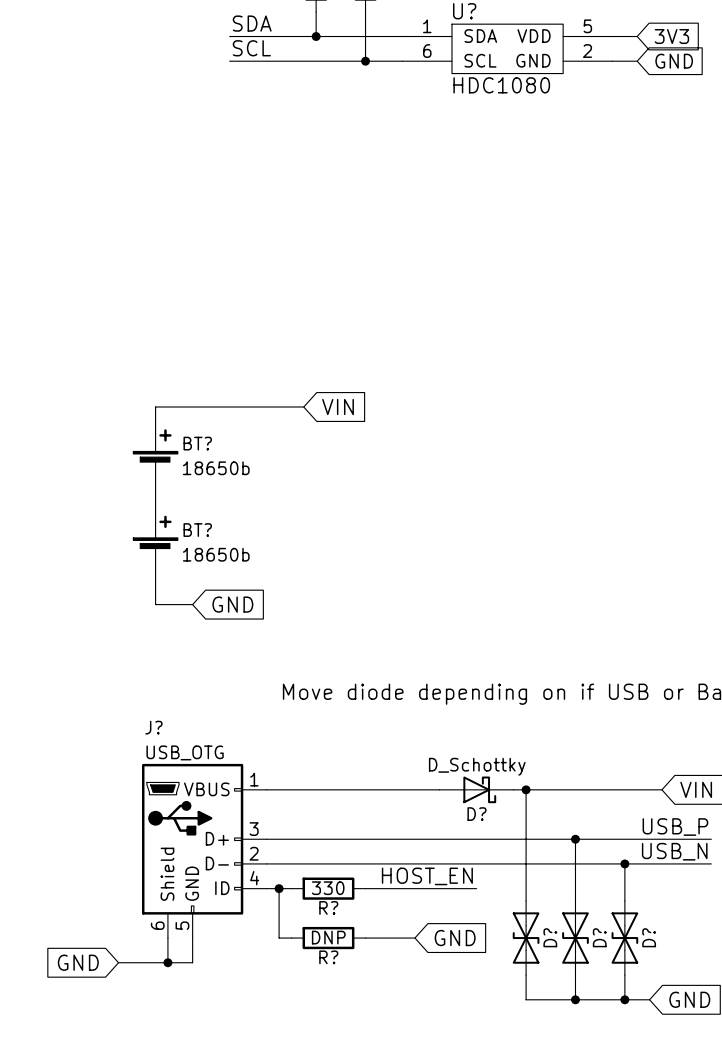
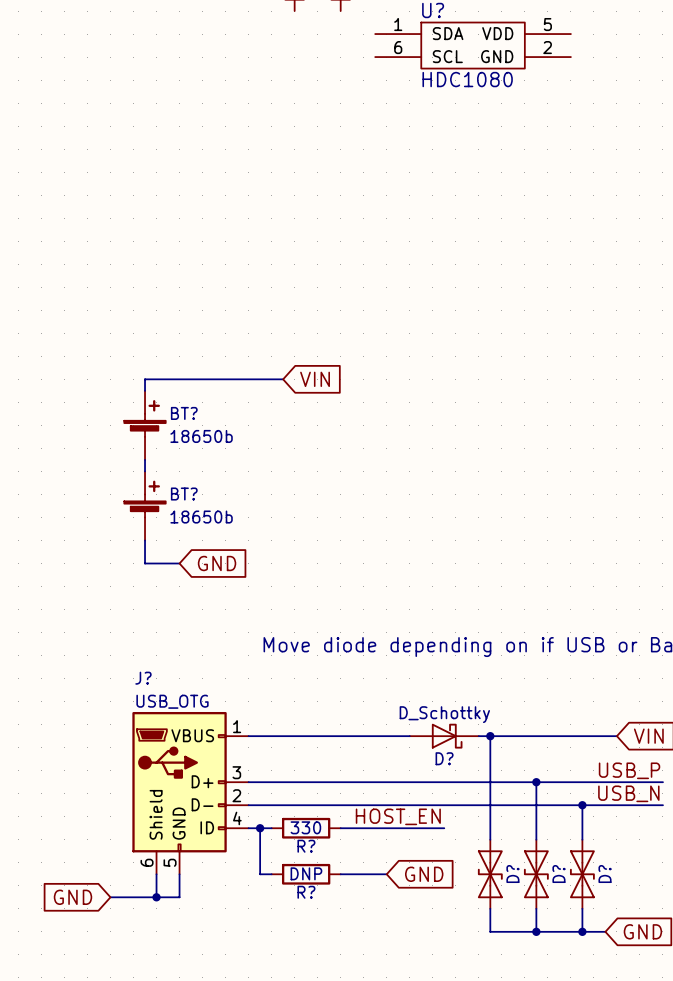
wire: (316, 11) (316, 36) -> none
wire: (365, 11) (365, 61) -> none
label: SDA (252, 23) -> none
wire: (229, 36) (402, 36) -> none
junction: (316, 36) -> none
wire: (612, 36) (637, 36) -> none
global label: 3V3 (671, 36) -> none
label: SCL (251, 48) -> none
wire: (229, 61) (402, 61) -> none
junction: (365, 61) -> none
wire: (612, 61) (637, 61) -> none
global label: GND (674, 61) -> none

